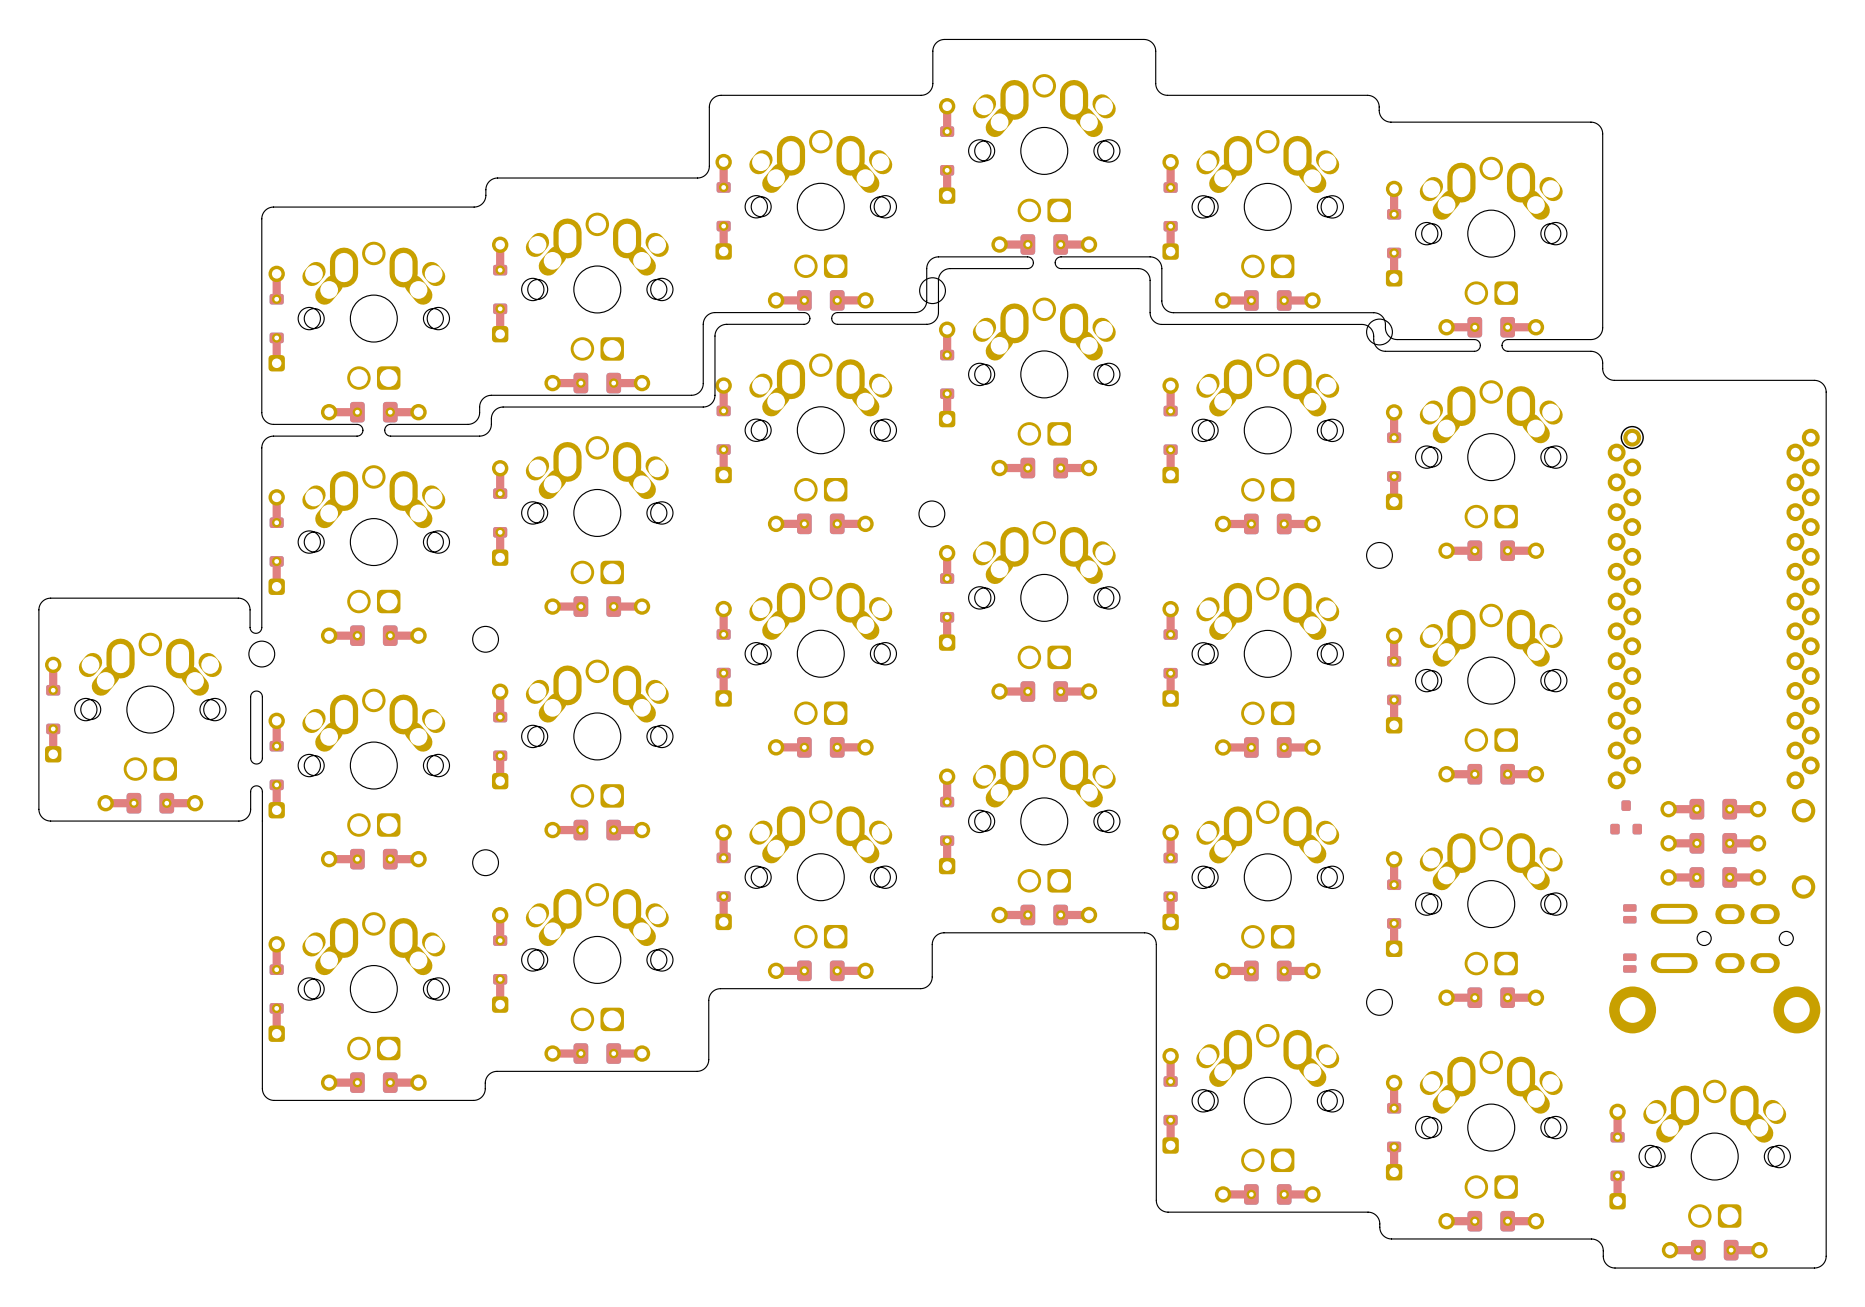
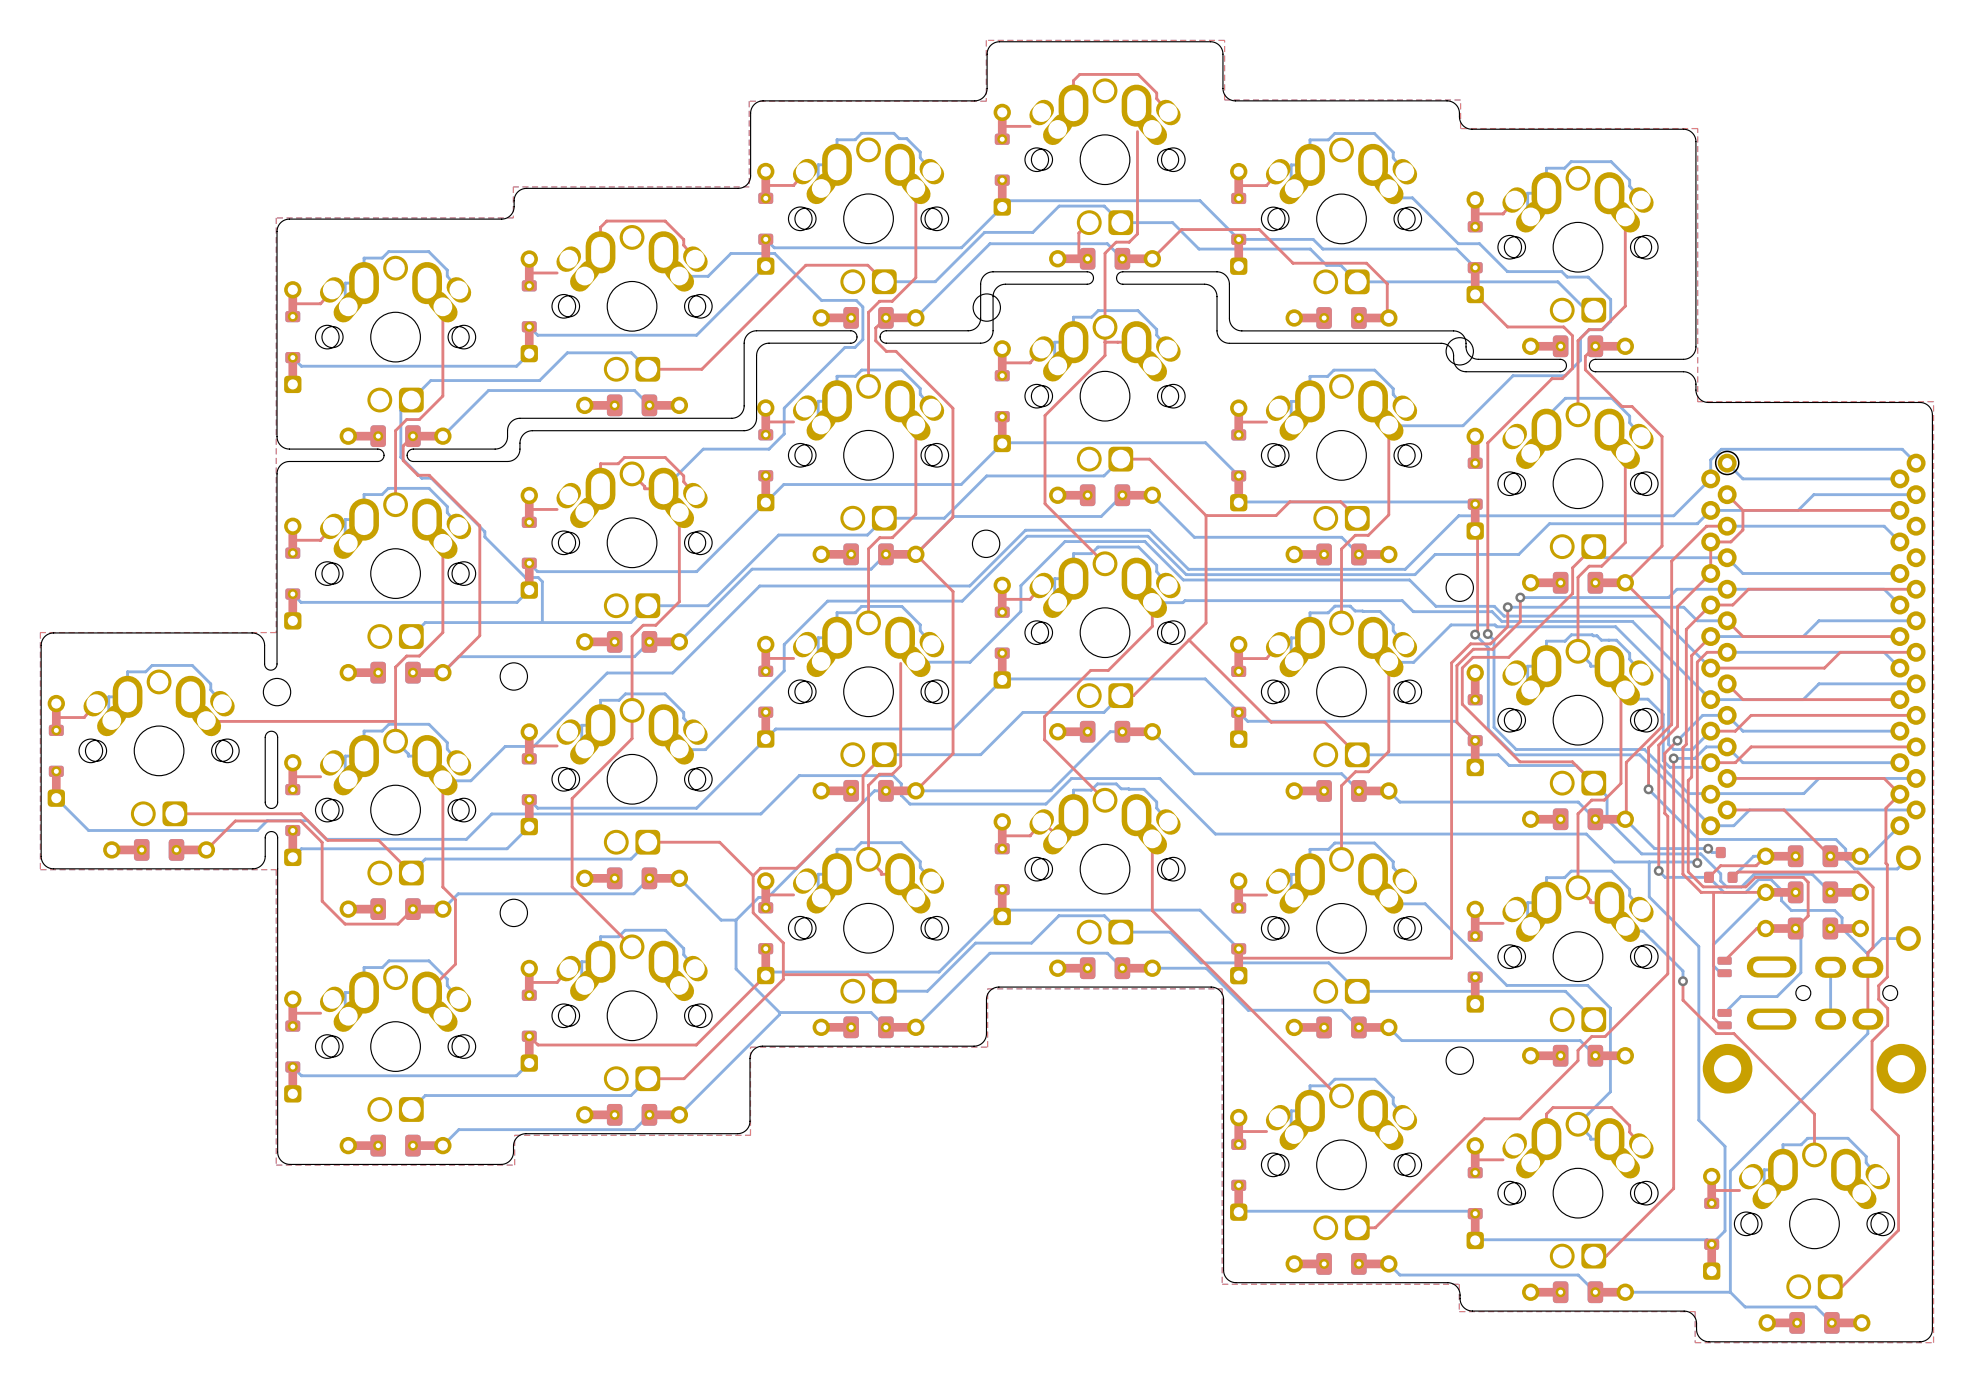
top zone outline: none -> (986, 40) (1224, 40) (1224, 100) (1460, 100) (1460, 128) (1697, 128) (1697, 401) (1933, 401) (1933, 1342) (1695, 1342) (1695, 1311) (1459, 1311) (1459, 1284) (1222, 1284) (1222, 988) (987, 988) (987, 1047) (750, 1047) (750, 1135) (514, 1135) (514, 1165) (276, 1165) (276, 869) (40, 869) (40, 632) (276, 632) (276, 217) (513, 217) (513, 186) (749, 186) (749, 101) (986, 101) (986, 40)
top track: none -> (1073, 105) (1073, 80) (1079, 74) (1138, 74) (1156, 93) (1156, 98) (1168, 112)
top track: none -> (1002, 126) (1030, 126)
top track: none -> (1137, 131) (1137, 233) (1129, 242) (1116, 242) (1105, 253) (1105, 355) (1045, 415) (1045, 503) (1105, 563)
top track: none -> (900, 164) (901, 171) (915, 188) (915, 277) (892, 301) (879, 301) (868, 312) (868, 386)
bottom track: none -> (1373, 164) (1374, 171) (1398, 197) (1412, 197) (1458, 243) (1479, 243) (1507, 271) (1561, 271) (1567, 277) (1588, 277) (1610, 299) (1610, 321) (1602, 329) (1589, 329) (1580, 338) (1580, 360) (1565, 375) (1513, 375) (1463, 425) (1388, 425)
top track: none -> (805, 171) (793, 185) (765, 185)
bottom track: none -> (931, 171) (920, 157) (920, 152) (906, 138) (899, 138) (893, 133) (861, 133) (855, 139) (837, 139) (837, 164) (818, 164) (816, 182) (821, 188)
top track: none -> (1278, 171) (1266, 185) (1238, 185)
bottom track: none -> (1404, 171) (1393, 157) (1393, 152) (1374, 133) (1334, 133) (1328, 139) (1309, 139) (1309, 164) (1291, 164) (1289, 182) (1294, 188)
top track: none -> (1609, 193) (1611, 200) (1625, 216) (1625, 306) (1601, 329) (1589, 329) (1578, 340) (1578, 414)
top track: none -> (1514, 200) (1503, 213) (1475, 213)
bottom track: none -> (1641, 200) (1629, 186) (1629, 180) (1611, 161) (1571, 161) (1564, 168) (1546, 168) (1546, 193) (1527, 193) (1525, 211) (1530, 216)
top track: none -> (1089, 222) (1078, 233) (1078, 258)
bottom track: none -> (765, 239) (774, 247) (961, 247) (1008, 200) (1200, 200) (1238, 239) (1313, 239) (1322, 249) (1456, 249) (1475, 267)
top track: none -> (600, 252) (600, 227) (606, 221) (665, 221) (683, 239) (683, 245) (695, 259)
bottom track: none -> (1122, 258) (1107, 243) (989, 243) (915, 317)
top track: none -> (1122, 258) (1152, 258) (1181, 229) (1259, 229) (1293, 263) (1366, 263) (1387, 283) (1387, 317)
bottom track: none -> (765, 266) (696, 335) (537, 335) (529, 326)
top track: none -> (1475, 267) (1475, 294) (1507, 326) (1563, 326) (1572, 335) (1572, 368) (1562, 378) (1552, 378) (1487, 442) (1487, 634)
top track: none -> (529, 272) (557, 272)
bottom track: none -> (679, 276) (708, 276) (730, 253) (774, 253) (821, 300) (856, 300) (862, 306) (862, 339) (855, 347) (844, 347) (784, 408) (784, 433) (769, 449) (703, 449) (663, 488)
bottom track: none -> (884, 281) (935, 281) (984, 232) (1032, 232) (1059, 206) (1104, 206) (1120, 222) (1172, 222) (1199, 249) (1310, 249) (1326, 265) (1340, 265) (1357, 281) (1557, 281) (1586, 310) (1593, 310)
top track: none -> (884, 281) (867, 265) (805, 265) (701, 369) (647, 369)
top track: none -> (427, 283) (428, 290) (442, 306) (442, 396) (419, 419) (406, 419) (395, 430) (395, 504)
top track: none -> (332, 289) (320, 303) (292, 303)
bottom track: none -> (458, 289) (447, 276) (447, 270) (428, 251) (388, 251) (382, 258) (364, 258) (364, 283) (345, 283) (343, 301) (348, 306)
top track: none -> (915, 317) (885, 317) (875, 328) (875, 340) (886, 351) (895, 351) (952, 408) (952, 517) (915, 554)
top track: none -> (1105, 342) (1136, 342)
top track: none -> (1625, 346) (1595, 346) (1585, 356) (1585, 369) (1622, 406) (1632, 406) (1662, 436) (1662, 546) (1625, 582)
top track: none -> (1041, 349) (1030, 362) (1002, 362)
bottom track: none -> (1168, 349) (1156, 335) (1156, 329) (1137, 310) (1098, 310) (1091, 317) (1073, 317) (1073, 342) (1054, 342) (1052, 360) (1057, 365)
bottom track: none -> (529, 353) (516, 366) (301, 366) (292, 357)
bottom track: none -> (647, 369) (631, 352) (567, 352) (539, 380) (430, 380) (400, 410) (400, 457) (421, 478) (431, 478) (484, 531) (484, 536) (525, 577) (538, 577) (542, 581) (542, 622)
top track: none -> (1373, 401) (1374, 408) (1388, 425) (1388, 514) (1368, 535) (1355, 535) (1341, 549) (1341, 622)
bottom track: none -> (649, 405) (634, 390) (488, 390) (442, 436)
bottom track: none -> (931, 408) (920, 394) (920, 388) (901, 370) (861, 370) (855, 376) (837, 376) (837, 401) (818, 401) (816, 419) (821, 424)
bottom track: none -> (1404, 408) (1393, 394) (1393, 388) (1374, 370) (1333, 370) (1327, 376) (1309, 376) (1309, 401) (1291, 401) (1289, 419) (1294, 425)
top track: none -> (765, 421) (793, 421)
top track: none -> (1238, 422) (1266, 422)
top track: none -> (915, 424) (915, 514) (892, 537) (879, 537) (868, 548) (868, 622)
bottom track: none -> (1546, 429) (1546, 417) (1565, 398) (1611, 398) (1629, 416) (1629, 422) (1641, 436)
top track: none -> (442, 436) (412, 436) (403, 445) (403, 460) (417, 475) (429, 475) (479, 525) (479, 635) (442, 672) (412, 672)
top track: none -> (1625, 453) (1625, 542) (1601, 566) (1589, 566) (1578, 577) (1578, 651)
bottom track: none -> (1120, 459) (1103, 475) (986, 475) (944, 518) (884, 518) (867, 535) (778, 535) (707, 605) (647, 605) (631, 622) (425, 622) (411, 636)
top track: none -> (1120, 459) (1149, 459) (1206, 515)
bottom track: none -> (1727, 463) (1742, 478) (1899, 478)
bottom track: none -> (1916, 463) (1902, 449) (1721, 449) (1710, 459) (1710, 478) (1673, 515) (1458, 515) (1405, 569) (1188, 569) (1149, 530) (1025, 530) (969, 585) (759, 585) (672, 673) (607, 673) (533, 746) (505, 746) (470, 780) (443, 780) (427, 761) (427, 756) (408, 756) (395, 741)
top track: none -> (632, 473) (644, 488) (663, 488) (663, 494) (679, 512) (679, 601) (655, 625) (643, 625) (632, 636) (632, 738) (572, 798) (572, 886) (632, 946)
bottom track: none -> (1238, 475) (1205, 442) (1002, 442) (961, 484) (783, 484) (696, 571) (537, 571) (529, 563)
top track: none -> (600, 488) (600, 463) (618, 463) (624, 457) (665, 457) (683, 475) (683, 481) (695, 495)
top track: none -> (1727, 494) (1742, 510)
bottom track: none -> (1916, 494) (1813, 494) (1798, 510) (1710, 510) (1697, 523) (1549, 523) (1518, 554) (1435, 554) (1414, 574) (1186, 574) (1147, 536) (1027, 536) (962, 601) (827, 601) (784, 644) (784, 670) (705, 749) (679, 749)
bottom track: none -> (1122, 495) (1101, 516) (953, 516) (915, 554)
bottom track: none -> (1152, 495) (1194, 537) (1341, 537) (1358, 554)
bottom track: none -> (1238, 502) (1472, 501) (1475, 504)
top track: none -> (1475, 504) (1475, 531) (1477, 533) (1477, 632) (1475, 634)
top track: none -> (529, 509) (557, 509)
top track: none -> (1742, 510) (1742, 529) (1730, 541) (1710, 541) (1710, 573) (1677, 606) (1677, 726) (1658, 745) (1658, 870)
top track: none -> (1742, 510) (1899, 510)
top track: none -> (1206, 515) (1206, 623) (1133, 695) (1120, 695)
top track: none -> (1206, 515) (1276, 515) (1289, 501) (1340, 501) (1357, 518)
top track: none -> (332, 526) (320, 540) (292, 540)
bottom track: none -> (458, 526) (447, 512) (447, 506) (429, 488) (388, 488) (382, 494) (364, 494) (364, 519) (345, 519) (343, 537) (348, 543)
bottom track: none -> (1727, 526) (1884, 526) (1899, 541)
top track: none -> (1727, 526) (1706, 526) (1671, 561) (1671, 724) (1648, 747) (1648, 789)
top track: none -> (442, 543) (442, 632) (419, 656) (406, 656) (395, 667) (395, 741)
bottom track: none -> (1593, 546) (1604, 557) (1727, 557) (1742, 573) (1899, 573)
top track: none -> (1593, 546) (1572, 567) (1572, 593) (1508, 657) (1472, 657) (1462, 668) (1462, 704) (1519, 761) (1572, 761) (1593, 783)
bottom track: none -> (885, 554) (871, 569) (752, 569) (679, 641)
top track: none -> (915, 554) (953, 591) (953, 753) (915, 790) (885, 790)
top track: none -> (1136, 578) (1138, 585) (1152, 602) (1152, 626) (1108, 670) (1090, 670) (1044, 716) (1044, 739) (1105, 800)
top track: none -> (1625, 582) (1661, 619) (1661, 726) (1626, 762) (1626, 818) (1595, 819)
top track: none -> (1041, 585) (1030, 599) (1002, 599)
bottom track: none -> (1168, 585) (1156, 571) (1156, 565) (1138, 547) (1097, 547) (1091, 553) (1073, 553) (1073, 578) (1054, 578) (1052, 596) (1057, 602)
top track: none -> (1916, 589) (1748, 589) (1732, 605) (1710, 605) (1686, 629) (1686, 744) (1682, 747) (1682, 874) (1701, 892) (1795, 892)
bottom track: none -> (529, 590) (517, 602) (301, 602) (292, 594)
bottom track: none -> (1520, 597) (1668, 597) (1676, 589) (1884, 589) (1899, 605)
top track: none -> (1520, 597) (1520, 621) (1492, 649) (1473, 649) (1456, 665) (1456, 722) (1475, 740) (1475, 767)
via: none -> (1520, 597)
bottom track: none -> (1152, 602) (1182, 602) (1184, 600) (1402, 600) (1413, 611) (1492, 611) (1501, 621) (1632, 621) (1710, 699) (1803, 699) (1818, 683) (1916, 683)
bottom track: none -> (1507, 607) (1683, 607) (1697, 620) (1727, 620)
top track: none -> (1507, 607) (1507, 626) (1490, 643) (1470, 643) (1451, 662) (1451, 958) (1238, 958)
via: none -> (1507, 607)
top track: none -> (1727, 620) (1742, 636) (1899, 636)
bottom track: none -> (1916, 620) (1818, 620) (1803, 636) (1710, 636)
bottom track: none -> (1475, 634) (1488, 647) (1488, 729) (1513, 754) (1639, 754) (1710, 825) (1733, 825) (1749, 809) (1916, 809)
via: none -> (1475, 634)
bottom track: none -> (1487, 634) (1494, 640) (1494, 727) (1516, 749) (1644, 749) (1688, 793) (1803, 793) (1818, 778) (1916, 778)
via: none -> (1487, 634)
top track: none -> (1710, 636) (1691, 655) (1691, 777) (1688, 780) (1688, 871) (1703, 886) (1745, 886) (1755, 877) (1803, 877) (1808, 882) (1808, 915) (1795, 928) (1756, 928) (1724, 960)
top track: none -> (1189, 640) (1271, 722) (1324, 722) (1357, 754)
bottom track: none -> (649, 641) (634, 656) (458, 656) (442, 672)
bottom track: none -> (931, 644) (920, 630) (920, 624) (901, 606) (861, 606) (855, 612) (837, 612) (837, 637) (818, 637) (816, 655) (821, 661)
top track: none -> (1278, 644) (1266, 658) (1238, 658)
bottom track: none -> (1404, 644) (1393, 630) (1393, 624) (1380, 611) (1355, 611) (1350, 606) (1334, 606) (1328, 612) (1309, 612) (1309, 637) (1291, 637) (1291, 658) (1294, 661)
bottom track: none -> (1578, 651) (1590, 666) (1609, 666) (1609, 671) (1634, 699) (1647, 699) (1663, 714) (1663, 760) (1669, 767) (1706, 767) (1710, 762)
bottom track: none -> (1727, 652) (1884, 652) (1899, 668)
top track: none -> (1727, 652) (1707, 652) (1697, 662) (1697, 863)
top track: none -> (1916, 652) (1840, 652) (1824, 668) (1710, 668)
top track: none -> (765, 658) (793, 658)
bottom track: none -> (915, 661) (970, 662) (1020, 611) (1020, 585) (1064, 541) (1144, 541) (1183, 579) (1409, 579) (1435, 606) (1494, 606) (1504, 616) (1658, 616) (1710, 668)
bottom track: none -> (1388, 661) (1374, 644) (1374, 650) (1387, 662) (1413, 662) (1451, 624) (1615, 626) (1668, 679) (1668, 744) (1673, 749) (1692, 749) (1710, 731)
top track: none -> (1388, 661) (1388, 751) (1368, 771) (1355, 771) (1341, 785) (1341, 859)
top track: none -> (900, 663) (900, 765) (892, 774) (879, 774) (868, 785) (868, 859) (881, 874) (900, 874) (900, 879) (915, 897)
bottom track: none -> (1641, 673) (1629, 659) (1629, 653) (1616, 640) (1601, 640) (1597, 635) (1592, 634) (1571, 634) (1565, 641) (1546, 641) (1546, 666) (1527, 666) (1527, 680) (1525, 682) (1530, 689)
top track: none -> (1727, 683) (1742, 699) (1899, 699)
top track: none -> (1625, 689) (1620, 694) (1620, 783) (1604, 800) (1591, 800) (1578, 813) (1578, 887) (1590, 902) (1609, 902) (1609, 907) (1625, 926)
bottom track: none -> (1120, 695) (1103, 712) (1022, 712) (980, 754) (884, 754)
top track: none -> (95, 703) (84, 717) (56, 717)
bottom track: none -> (222, 703) (210, 689) (210, 683) (192, 665) (152, 665) (145, 671) (127, 671) (127, 696) (108, 696) (107, 714) (111, 720)
top track: none -> (1916, 715) (1751, 715) (1735, 731) (1710, 731)
top track: none -> (206, 720) (395, 721)
bottom track: none -> (1899, 731) (1742, 731) (1727, 715) (1702, 715) (1677, 740)
bottom track: none -> (695, 732) (683, 718) (683, 712) (665, 693) (625, 693) (619, 700) (600, 700) (600, 725) (581, 725) (579, 743) (584, 749)
bottom track: none -> (1122, 731) (1110, 731) (1051, 790) (915, 790)
bottom track: none -> (1152, 731) (1194, 773) (1341, 773) (1358, 790)
bottom track: none -> (1475, 740) (1455, 721) (1247, 721) (1205, 678) (1003, 678) (953, 729) (775, 729) (696, 808) (537, 808) (529, 799)
top track: none -> (1677, 740) (1664, 753) (1664, 813) (1667, 816) (1667, 973) (1605, 1036) (1591, 1036) (1578, 1050) (1578, 1060) (1519, 1118) (1484, 1118) (1375, 1227) (1357, 1227)
via: none -> (1677, 740)
top track: none -> (529, 745) (557, 745)
top track: none -> (1916, 746) (1751, 746) (1735, 762) (1710, 762)
top track: none -> (884, 754) (863, 775) (863, 801) (796, 868) (760, 868) (753, 875)
bottom track: none -> (1357, 754) (1498, 754) (1509, 765) (1576, 765) (1607, 796) (1607, 819) (1641, 853) (1700, 853) (1720, 873) (1720, 881) (1726, 886) (1741, 886) (1754, 874) (1812, 874) (1830, 892)
bottom track: none -> (1673, 758) (1694, 758) (1706, 746) (1727, 746) (1742, 762) (1899, 762)
top track: none -> (1673, 758) (1673, 1188) (1606, 1256) (1593, 1256)
via: none -> (1673, 758)
bottom track: none -> (458, 762) (447, 749) (447, 742) (428, 724) (388, 724) (382, 731) (364, 731) (364, 756) (345, 756) (343, 774) (348, 779)
top track: none -> (292, 776) (320, 776)
top track: none -> (1727, 778) (1884, 778) (1899, 794) (1885, 808) (1887, 977) (1878, 985) (1878, 999) (1887, 1008) (1887, 1025) (1872, 1041) (1872, 1109) (1898, 1136) (1898, 1230) (1842, 1286) (1830, 1286)
top track: none -> (442, 779) (442, 887) (455, 899) (455, 964) (427, 992)
bottom track: none -> (1648, 789) (1698, 839) (1836, 839) (1845, 849) (1845, 860) (1854, 868) (1897, 868) (1908, 857)
via: none -> (1648, 789)
bottom track: none -> (885, 790) (874, 790) (767, 897) (758, 897) (736, 920)
bottom track: none -> (1388, 790) (1399, 802) (1578, 802) (1595, 819)
bottom track: none -> (56, 798) (88, 830) (257, 830) (267, 820) (307, 820) (326, 839) (466, 839) (491, 813) (760, 813) (799, 775) (893, 775) (901, 783) (901, 795) (909, 804) (1045, 804) (1071, 778) (1159, 778) (1215, 834) (1586, 834) (1614, 862) (1697, 863)
top track: none -> (1727, 809) (1784, 809) (1830, 856) (1860, 856)
top track: none -> (174, 813) (301, 813) (327, 840) (378, 840) (411, 873)
top track: none -> (1136, 815) (1138, 822) (1152, 838) (1152, 910) (1337, 1095) (1341, 1095)
bottom track: none -> (1625, 819) (1654, 848) (1708, 848) (1711, 852) (1720, 852)
bottom track: none -> (1168, 821) (1156, 808) (1156, 802) (1143, 789) (1121, 788) (1116, 783) (1097, 783) (1091, 790) (1073, 790) (1073, 820) (1057, 838)
bottom track: none -> (1899, 825) (1869, 856) (1860, 856)
bottom track: none -> (529, 826) (507, 848) (301, 848) (292, 857)
top track: none -> (1002, 835) (1030, 835) (1041, 821) (1052, 831) (1057, 838)
bottom track: none -> (647, 842) (631, 859) (425, 859) (411, 873)
top track: none -> (647, 842) (719, 842) (753, 875)
via: none -> (1708, 848)
top track: none -> (176, 849) (206, 849) (235, 820) (300, 820) (322, 842) (322, 901) (345, 924) (398, 924) (412, 909) (442, 909)
bottom track: none -> (1765, 856) (1753, 856) (1732, 877)
top track: none -> (1795, 856) (1765, 856) (1756, 865) (1720, 865) (1708, 877)
bottom track: none -> (1649, 862) (1649, 896) (1698, 946) (1698, 1120) (1725, 1146) (1725, 1230) (1711, 1244) (1707, 1239) (1475, 1240)
via: none -> (1697, 863)
bottom track: none -> (1658, 870) (1665, 877) (1708, 877) (1724, 892) (1745, 892) (1758, 879) (1771, 879) (1781, 890) (1781, 900) (1791, 910) (1834, 910) (1842, 917) (1842, 928) (1867, 952)
via: none -> (1658, 870)
top track: none -> (753, 875) (753, 912) (783, 943) (783, 979) (684, 1078) (647, 1078)
top track: none -> (1732, 877) (1737, 872) (1857, 872) (1873, 887) (1873, 947) (1867, 952) (1867, 1019)
bottom track: none -> (649, 878) (633, 893) (458, 893) (442, 909)
bottom track: none -> (679, 878) (721, 920) (736, 920)
bottom track: none -> (931, 881) (920, 867) (920, 861) (901, 842) (861, 842) (854, 849) (837, 849) (837, 874) (818, 874) (816, 893) (821, 897)
bottom track: none -> (1404, 881) (1393, 867) (1393, 861) (1374, 843) (1334, 843) (1328, 849) (1309, 849) (1309, 874) (1291, 874) (1289, 893) (1294, 898)
top track: none -> (1713, 892) (1713, 1017) (1721, 1025) (1724, 1025)
bottom track: none -> (1765, 892) (1713, 944) (1713, 965) (1720, 973) (1724, 973)
top track: none -> (765, 894) (793, 894)
top track: none -> (1238, 895) (1266, 895)
bottom track: none -> (1388, 898) (1394, 903) (1425, 903) (1506, 985) (1587, 985) (1610, 1008) (1610, 1091) (1578, 1124) (1590, 1139) (1609, 1139)
bottom track: none -> (1641, 909) (1629, 895) (1629, 889) (1611, 871) (1571, 871) (1564, 877) (1546, 877) (1546, 902) (1527, 902) (1525, 920) (1530, 926)
bottom track: none -> (736, 920) (736, 968) (779, 1012)
top track: none -> (1475, 923) (1503, 923)
bottom track: none -> (1625, 926) (1629, 931) (1642, 931) (1682, 971) (1682, 981)
bottom track: none -> (1795, 928) (1800, 933) (1800, 972) (1777, 996) (1740, 996) (1724, 1012)
bottom track: none -> (1908, 938) (1882, 938) (1867, 952)
top track: none -> (765, 948) (765, 975) (696, 1045) (538, 1045) (529, 1036)
bottom track: none -> (1238, 948) (1199, 910) (1008, 910) (1002, 916) (994, 916) (939, 972) (769, 972) (765, 975)
bottom track: none -> (1122, 968) (1107, 953) (989, 953) (915, 1027)
bottom track: none -> (1152, 968) (1206, 968) (1248, 1010) (1341, 1010) (1358, 1027)
bottom track: none -> (1830, 967) (1830, 1019)
top track: none -> (568, 968) (557, 982) (529, 982)
bottom track: none -> (695, 968) (683, 954) (683, 948) (665, 930) (625, 930) (618, 936) (600, 936) (600, 961) (581, 961) (579, 979) (584, 985)
top track: none -> (783, 974) (867, 974) (884, 991)
top track: none -> (1682, 981) (1682, 1000) (1716, 1033) (1733, 1033) (1814, 1114) (1814, 1154)
via: none -> (1682, 981)
bottom track: none -> (884, 991) (927, 991) (975, 943) (1031, 943) (1058, 915) (1104, 915) (1120, 932) (1170, 932) (1201, 962) (1328, 962) (1357, 991) (1565, 991) (1593, 1019)
bottom track: none -> (458, 999) (447, 985) (447, 979) (429, 960) (389, 960) (382, 967) (364, 967) (364, 992) (345, 992) (343, 1010) (348, 1016)
bottom track: none -> (779, 1012) (679, 1114)
bottom track: none -> (779, 1012) (871, 1012) (885, 1027)
top track: none -> (292, 1013) (320, 1013)
bottom track: none -> (1867, 1019) (1867, 1033) (1730, 1171) (1730, 1292)
bottom track: none -> (1388, 1027) (1401, 1040) (1580, 1040) (1595, 1055)
bottom track: none -> (529, 1063) (516, 1075) (301, 1075) (292, 1067)
bottom track: none -> (647, 1078) (631, 1095) (425, 1095) (411, 1109)
bottom track: none -> (649, 1114) (634, 1129) (458, 1129) (442, 1145)
bottom track: none -> (1404, 1117) (1393, 1103) (1393, 1097) (1374, 1079) (1334, 1079) (1328, 1085) (1309, 1085) (1309, 1110) (1291, 1110) (1289, 1128) (1294, 1134)
top track: none -> (1238, 1131) (1266, 1131)
top track: none -> (1546, 1139) (1546, 1114) (1553, 1107) (1611, 1107) (1629, 1125) (1629, 1132) (1641, 1145)
top track: none -> (1475, 1159) (1503, 1159)
bottom track: none -> (1877, 1176) (1866, 1162) (1866, 1156) (1848, 1138) (1807, 1138) (1801, 1144) (1782, 1144) (1782, 1169) (1764, 1169) (1762, 1187) (1767, 1193)
top track: none -> (1711, 1190) (1739, 1190)
bottom track: none -> (1238, 1212) (1472, 1211) (1475, 1213)
bottom track: none -> (1388, 1263) (1399, 1275) (1578, 1275) (1595, 1292)
bottom track: none -> (1625, 1292) (1730, 1292)
bottom track: none -> (1730, 1292) (1745, 1307) (1815, 1307) (1831, 1322)

